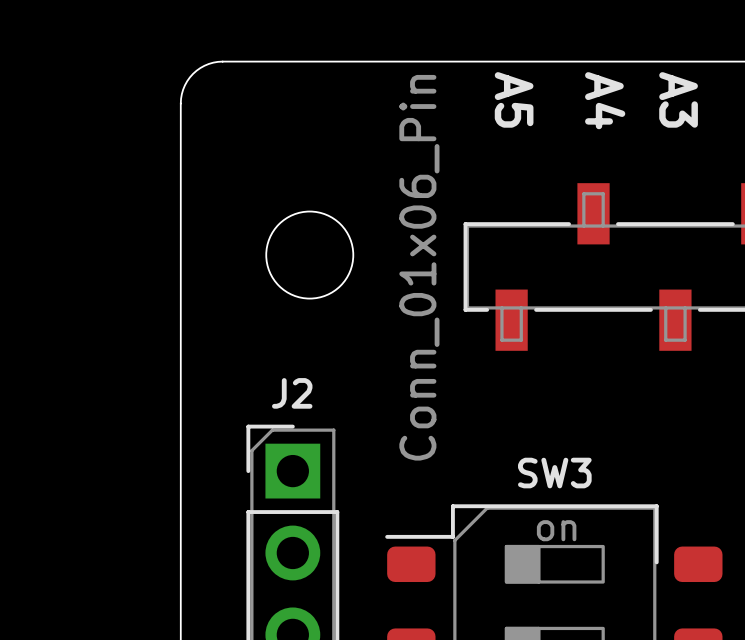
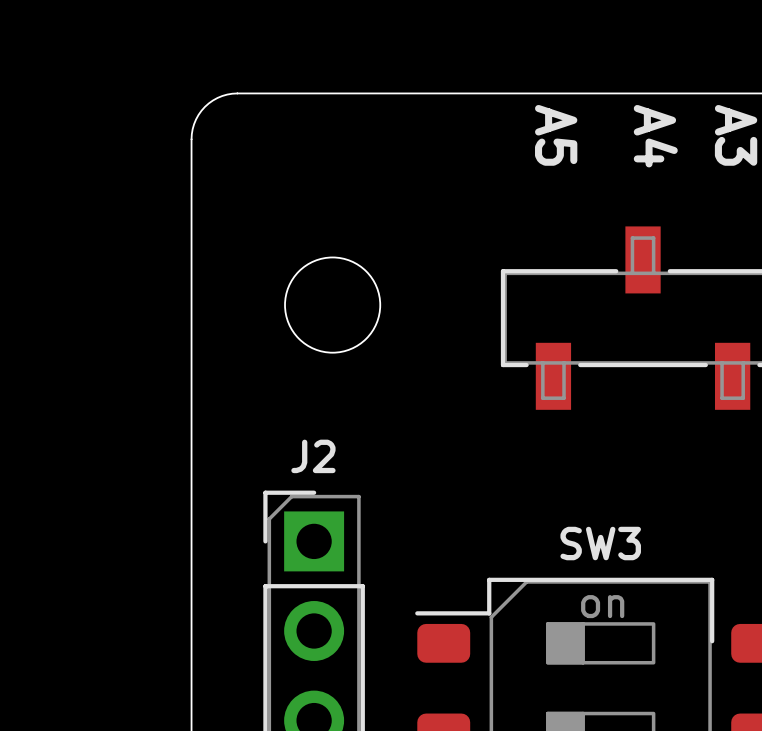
part value: Conn_01x06_Pin (419, 267) -> none

